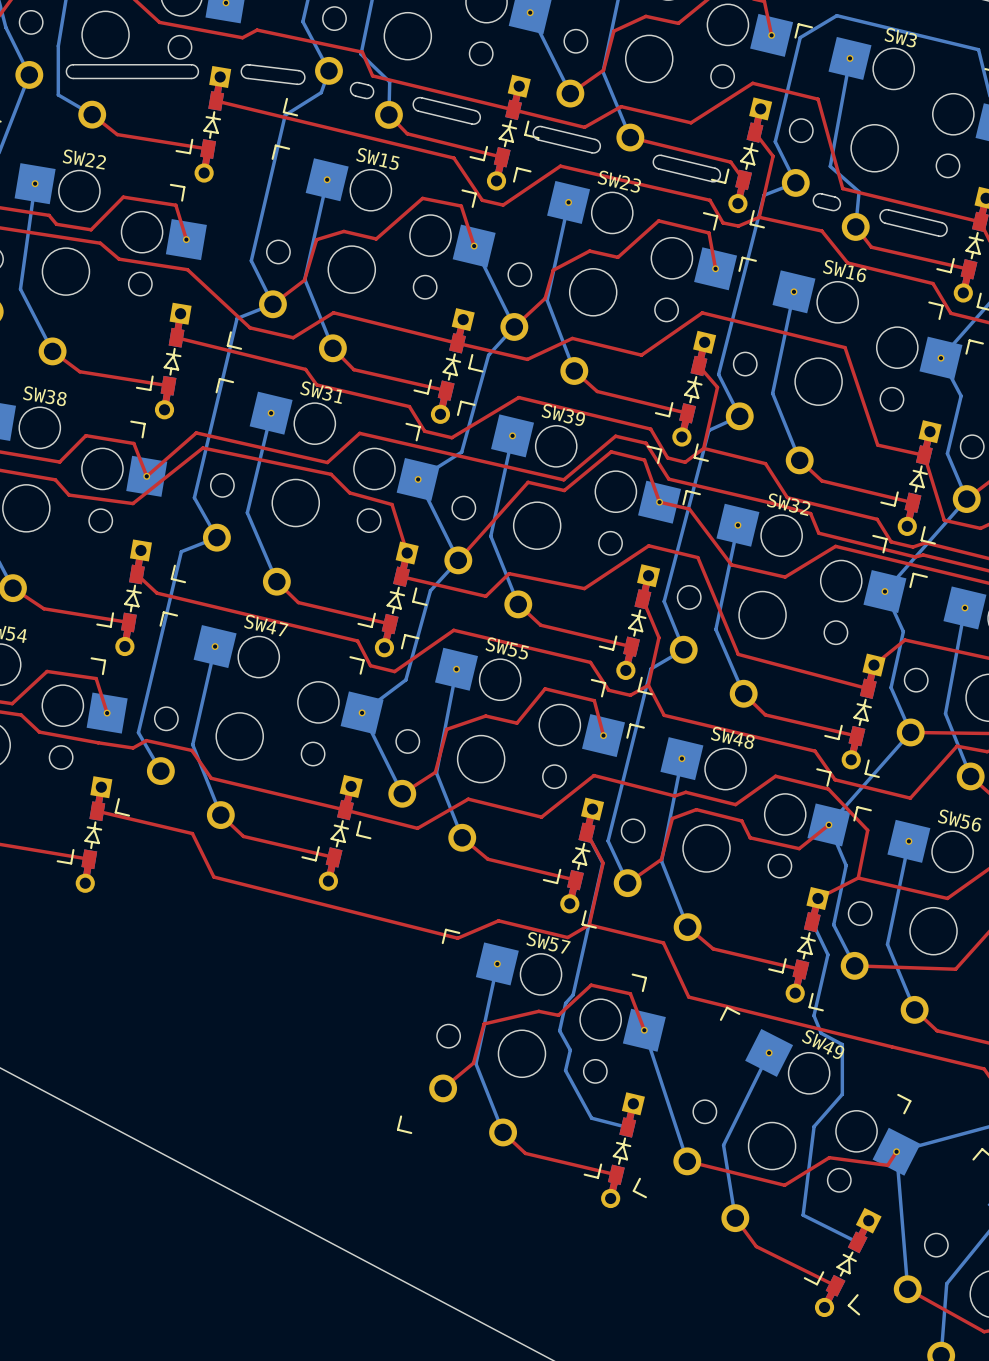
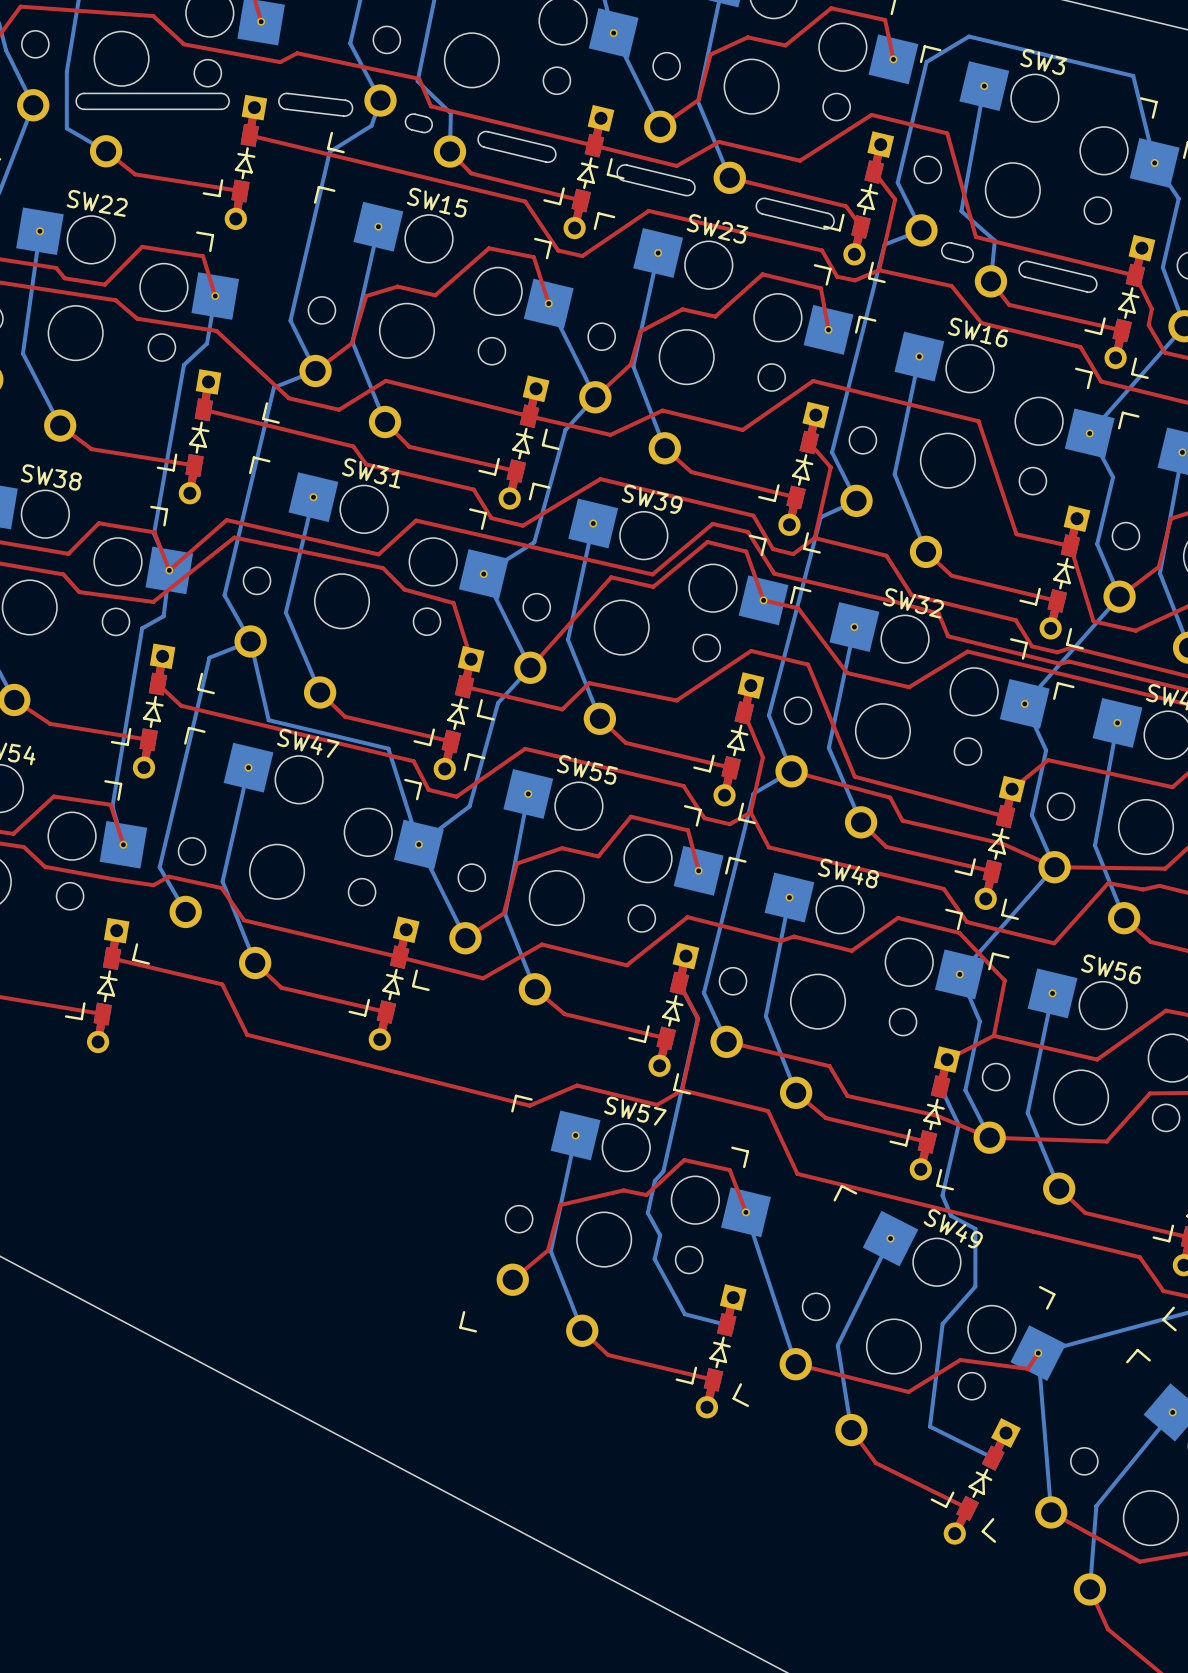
bottom track: none -> (215, 296) (207, 343) (183, 364) (154, 533) (169, 570) (163, 616) (142, 628) (112, 806) (123, 844)
bottom track: none -> (250, 641) (268, 720) (388, 748) (418, 844)
top track: none -> (791, 771) (890, 797) (902, 820) (1002, 843) (1054, 867)
top track: (828, 824) (799, 848) (750, 837) (741, 820) (696, 809) (672, 818) (661, 859) (627, 883) -> (989, 1137) (936, 1115) (847, 1095) (829, 1066) (726, 1041)

